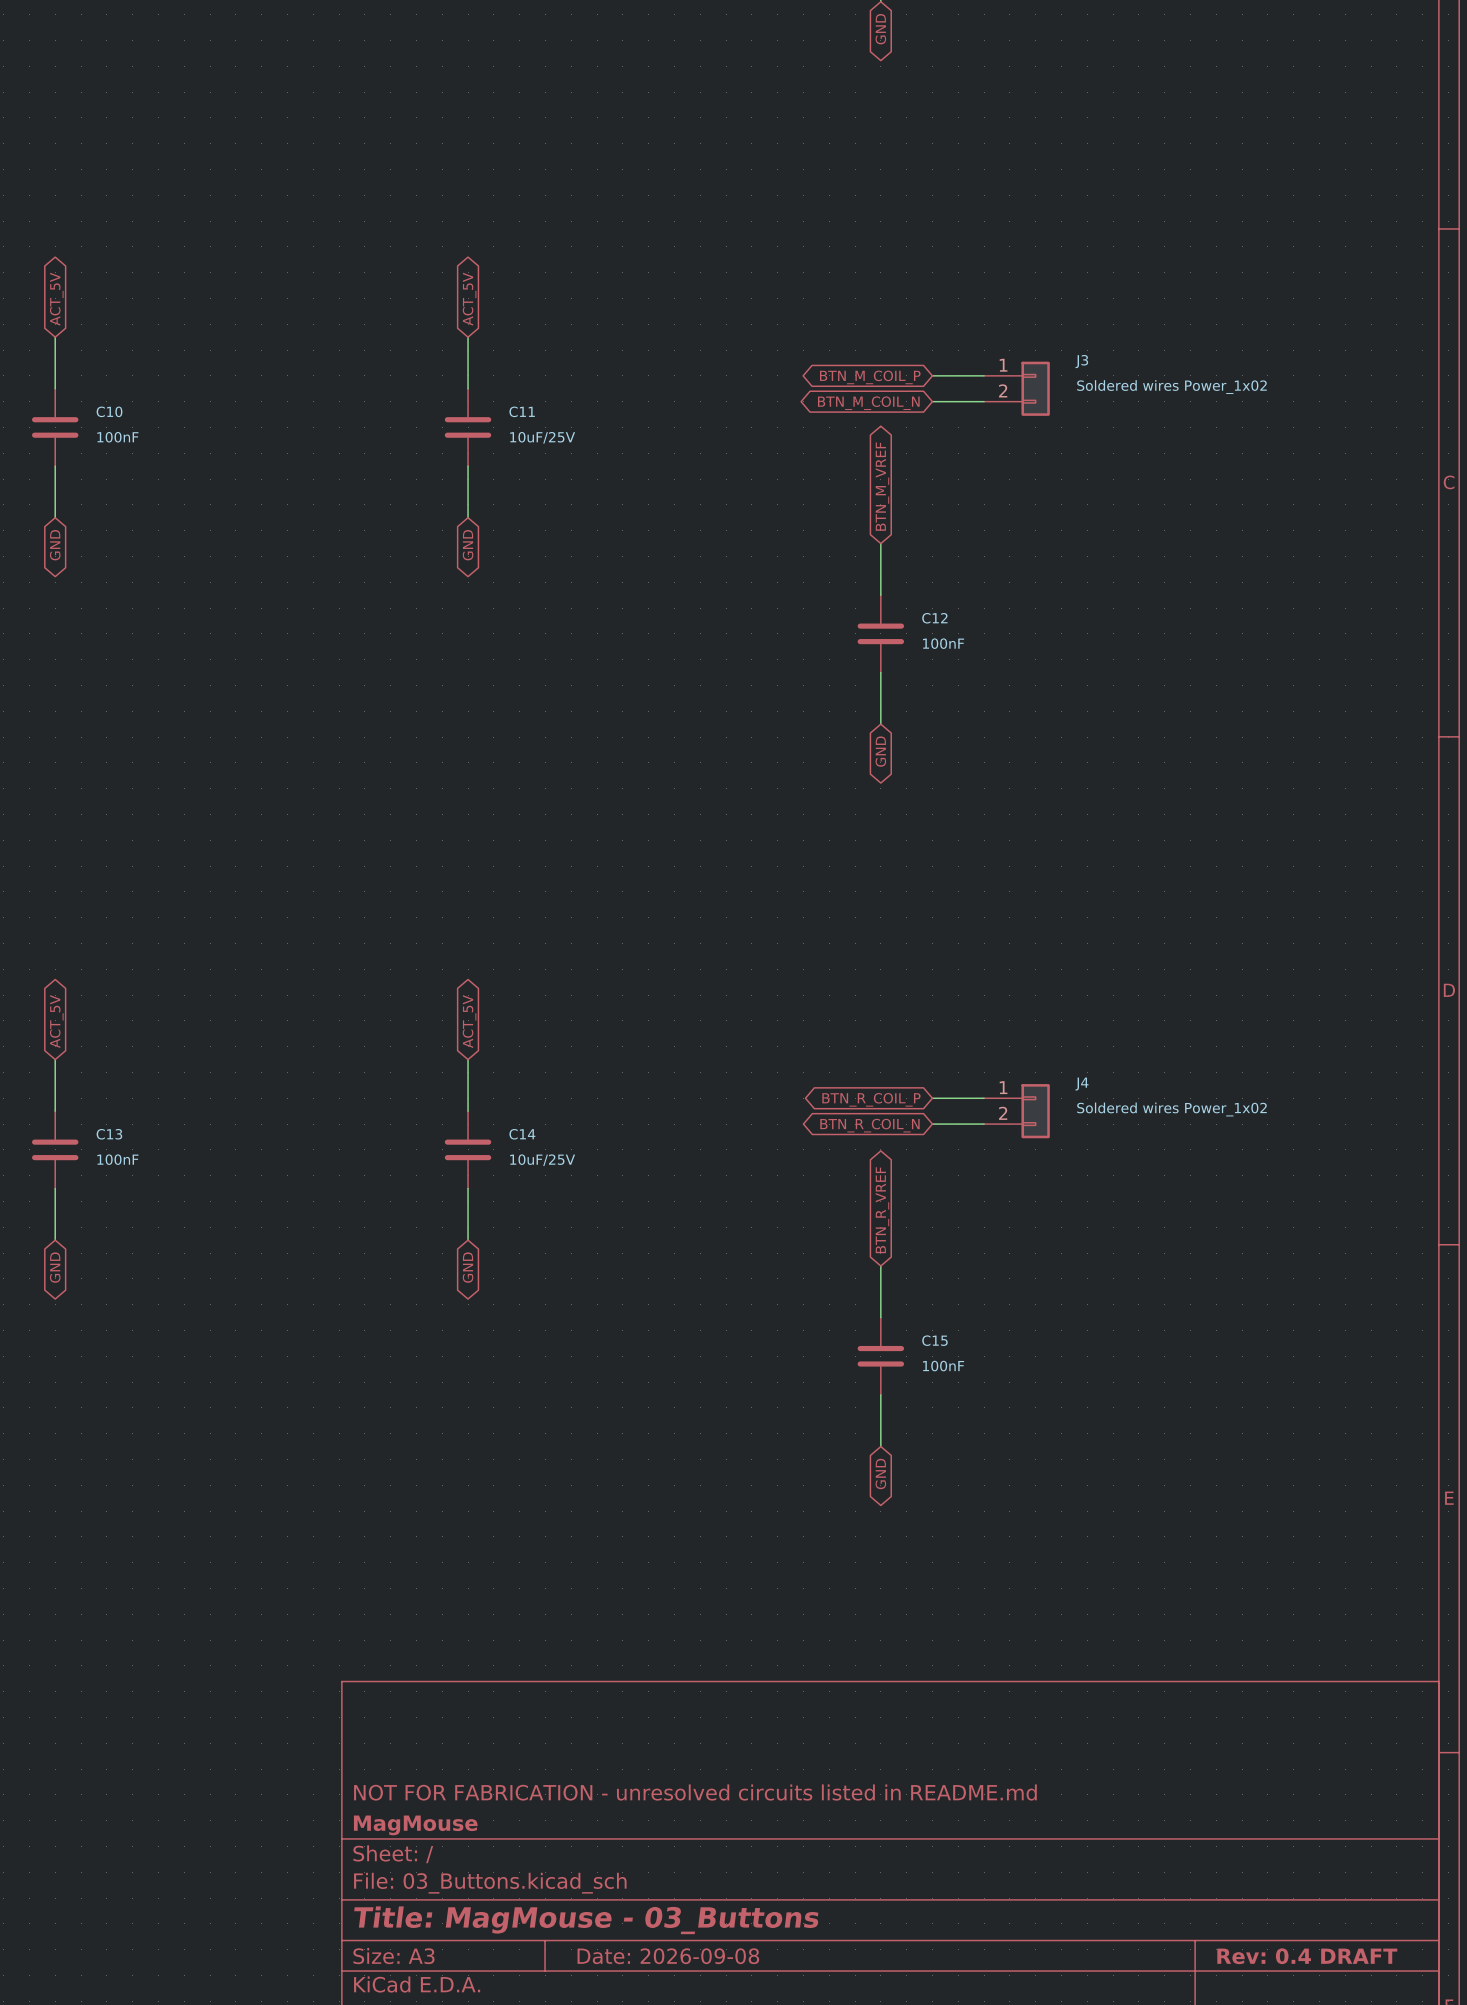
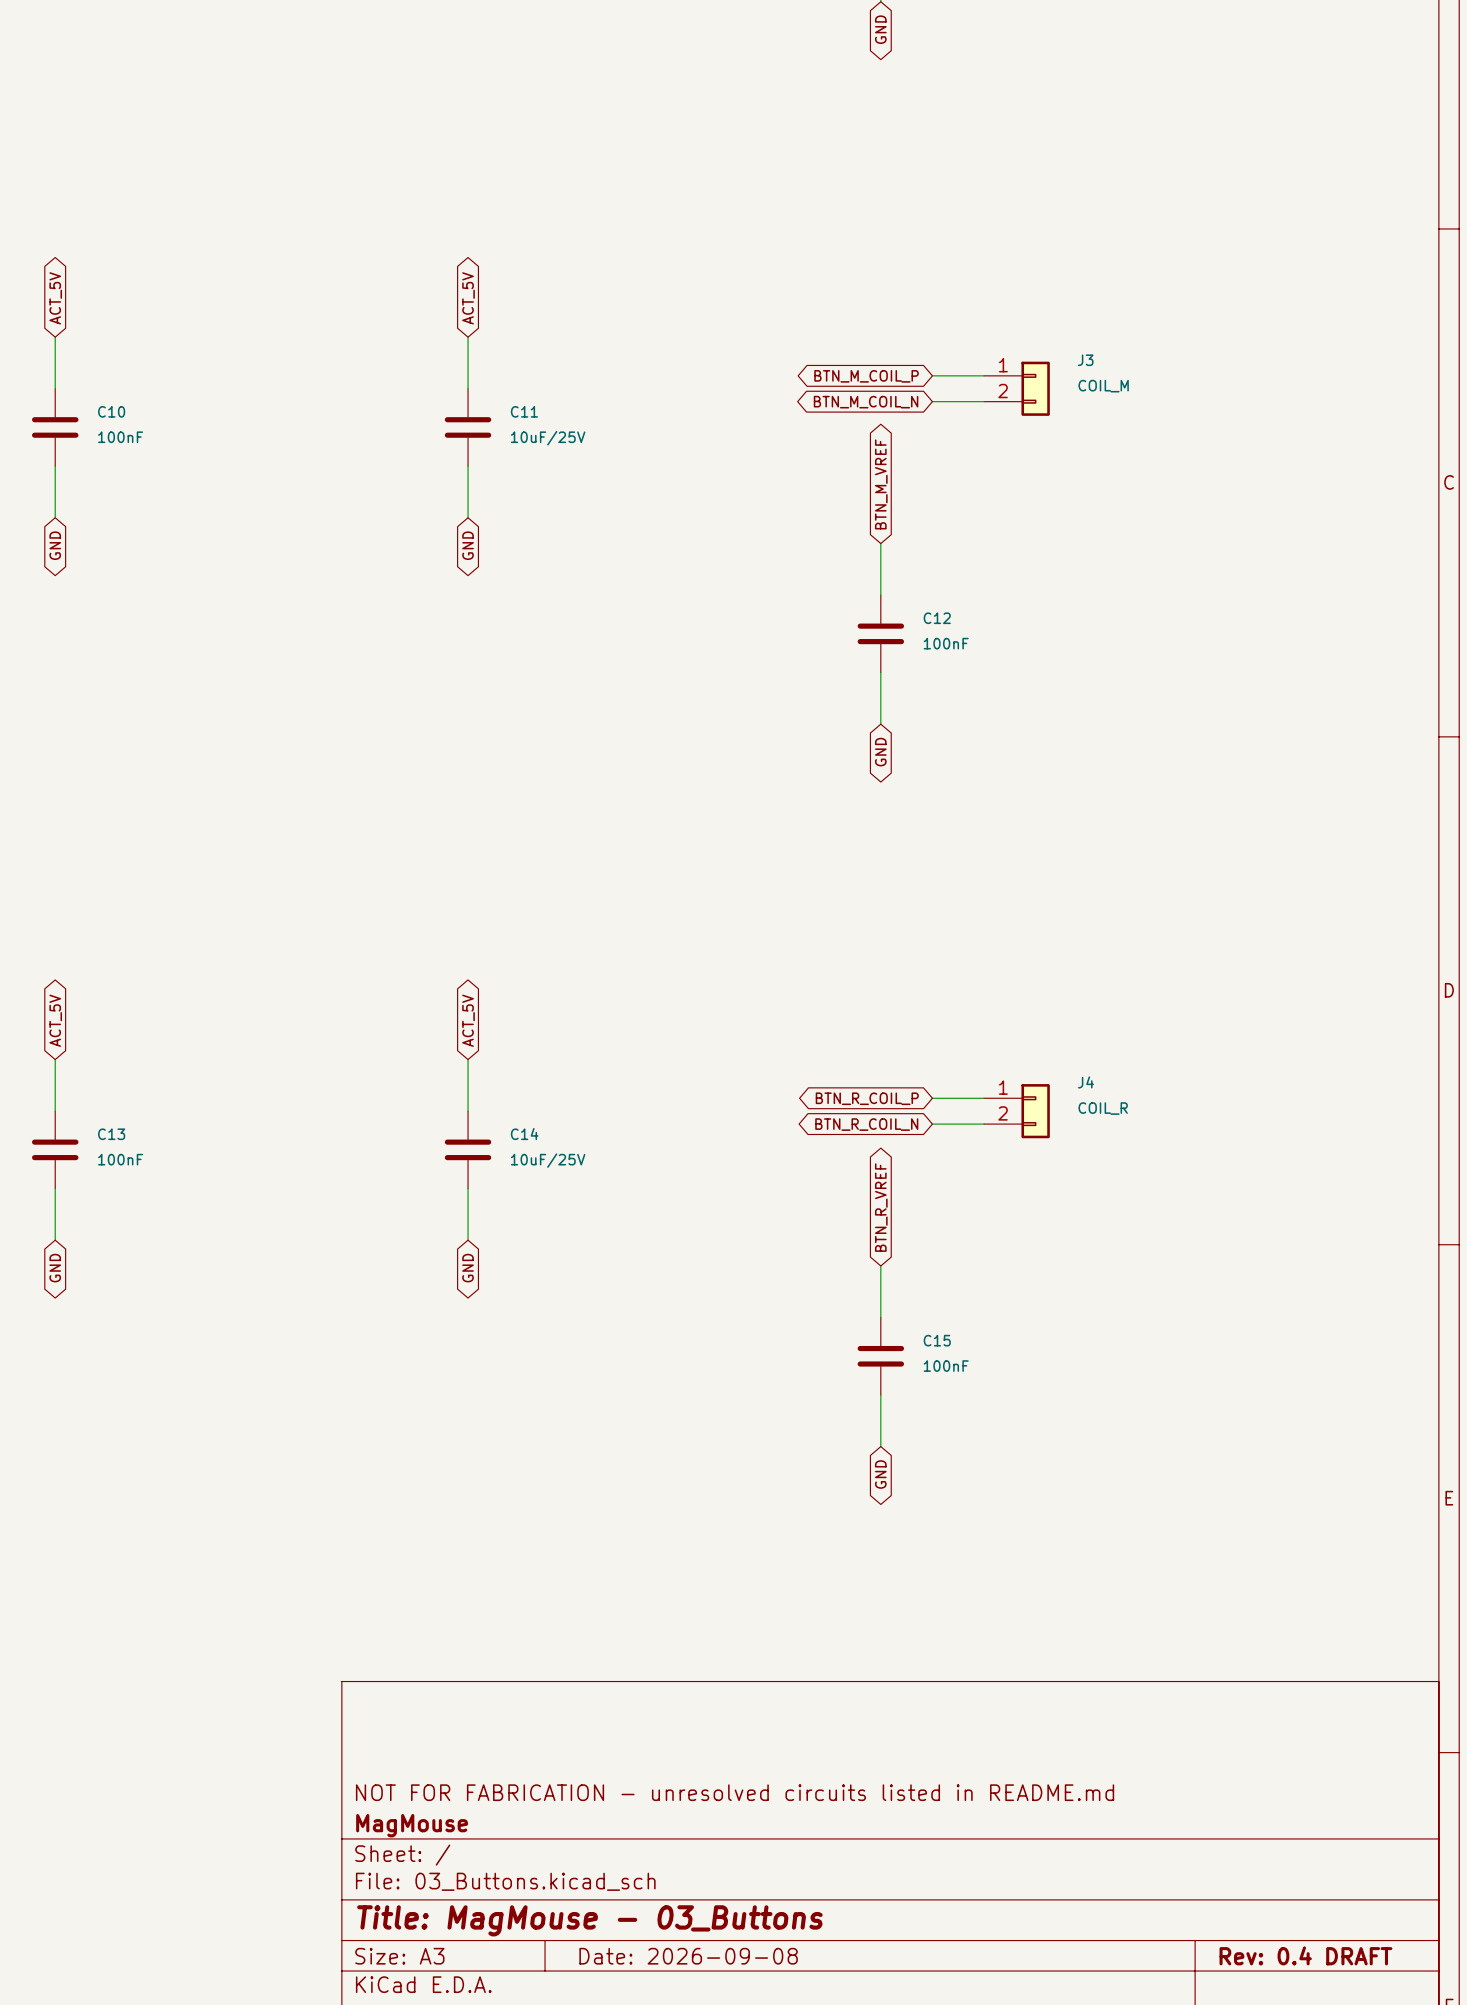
J3 value: Soldered wires Power_1x02 (1171, 387) -> COIL_M (1103, 386)
J4 value: Soldered wires Power_1x02 (1171, 1109) -> COIL_R (1103, 1108)

